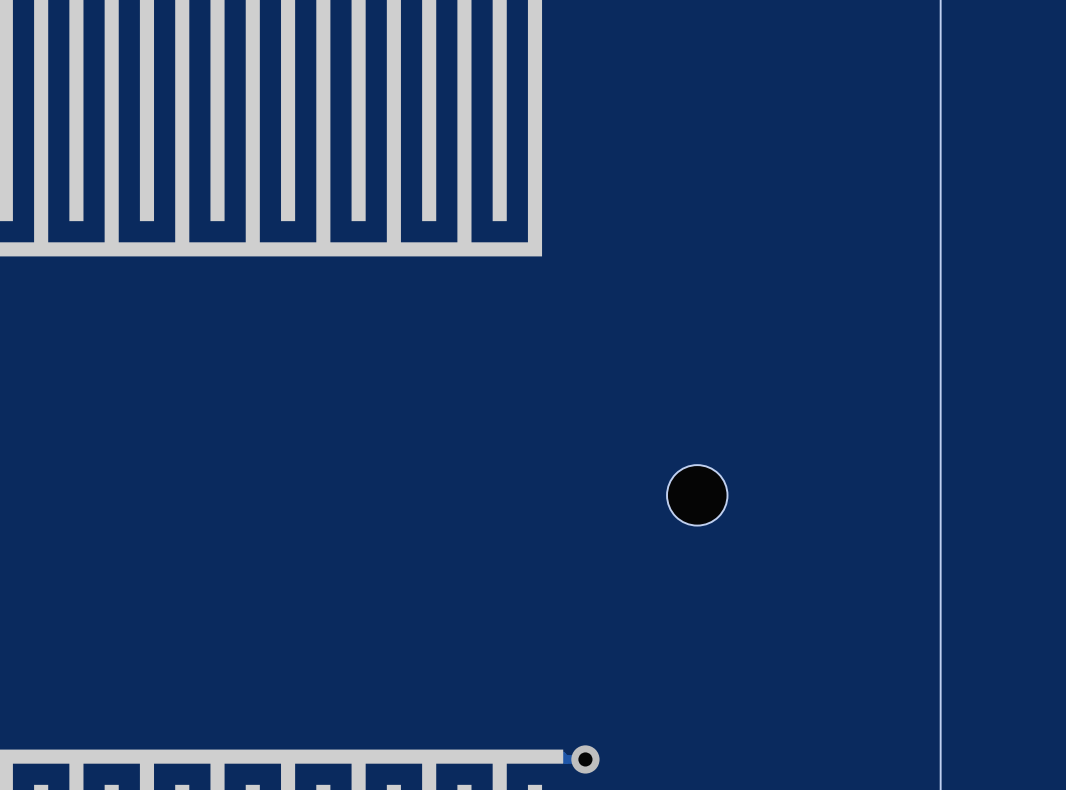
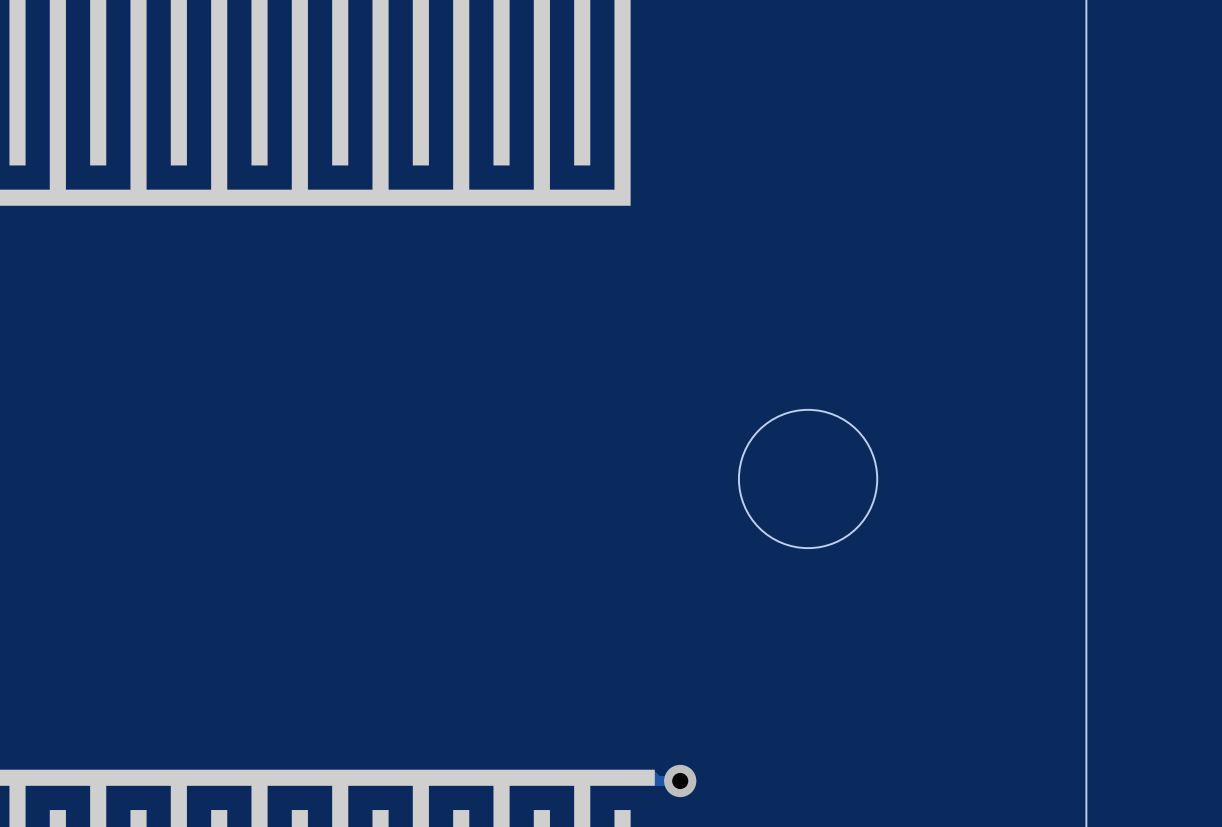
round board edge: none -> [738, 409, 878, 549]
part: (697, 495) -> none

